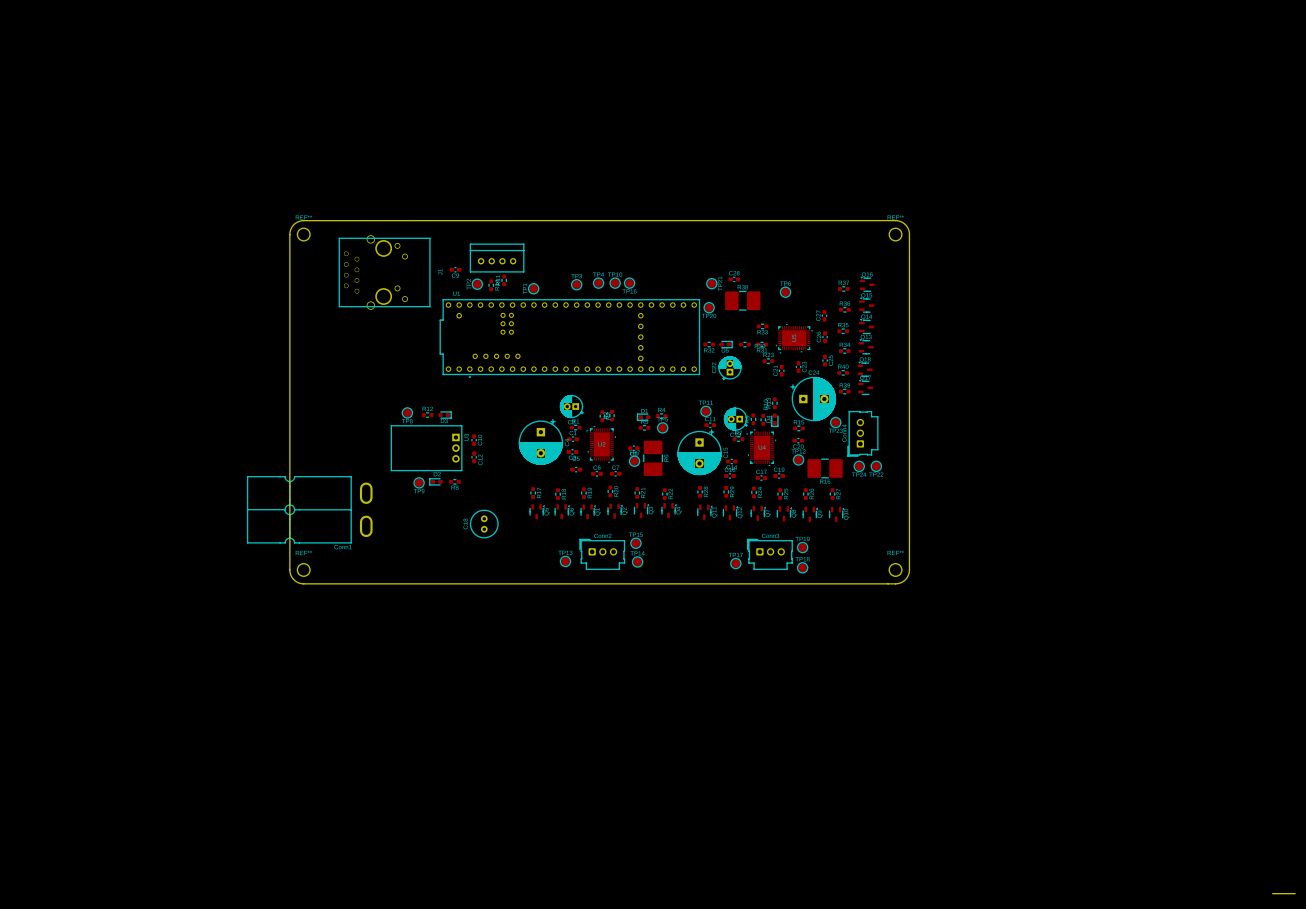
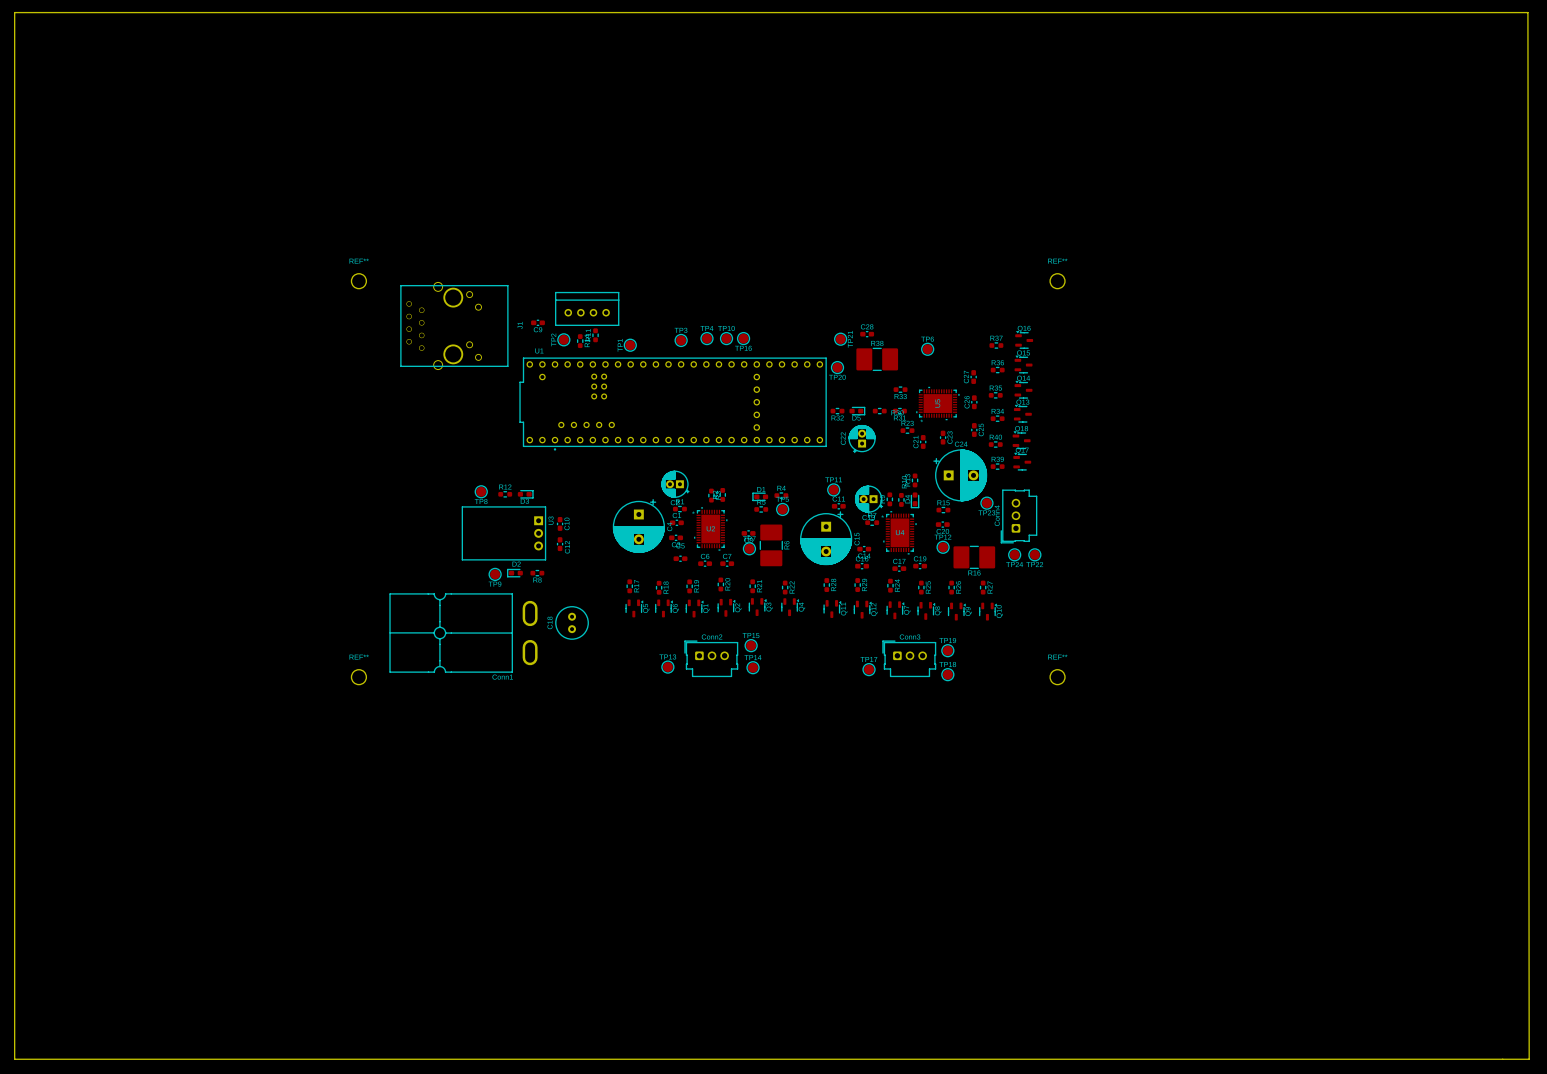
board edge: (895, 220) (303, 220) (296, 222) (291, 227) (289, 234) (289, 569) (291, 577) (296, 581) (303, 583) (895, 583) (902, 581) (908, 575) (909, 569) (909, 233) (904, 223) (895, 220) -> none
part position: (309, 509) -> (463, 633)
board edge: none -> (1502, 1059) (14, 1059) (14, 12) (1527, 12) (1529, 1059)

